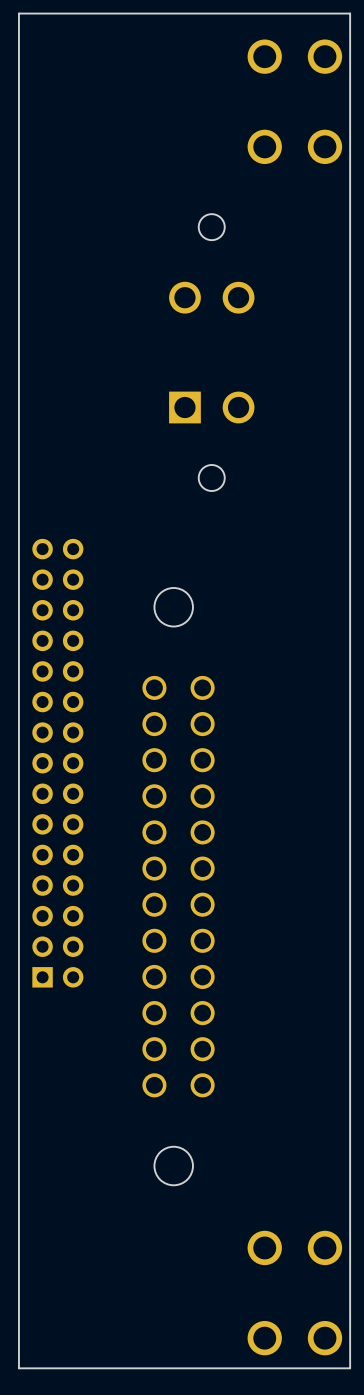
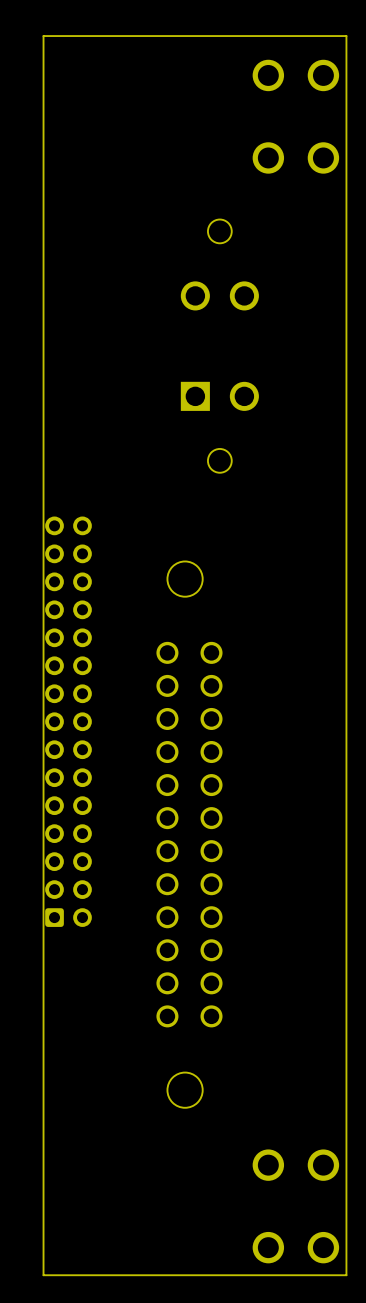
part footprint: [32, 538, 84, 988] -> [45, 516, 92, 927]

